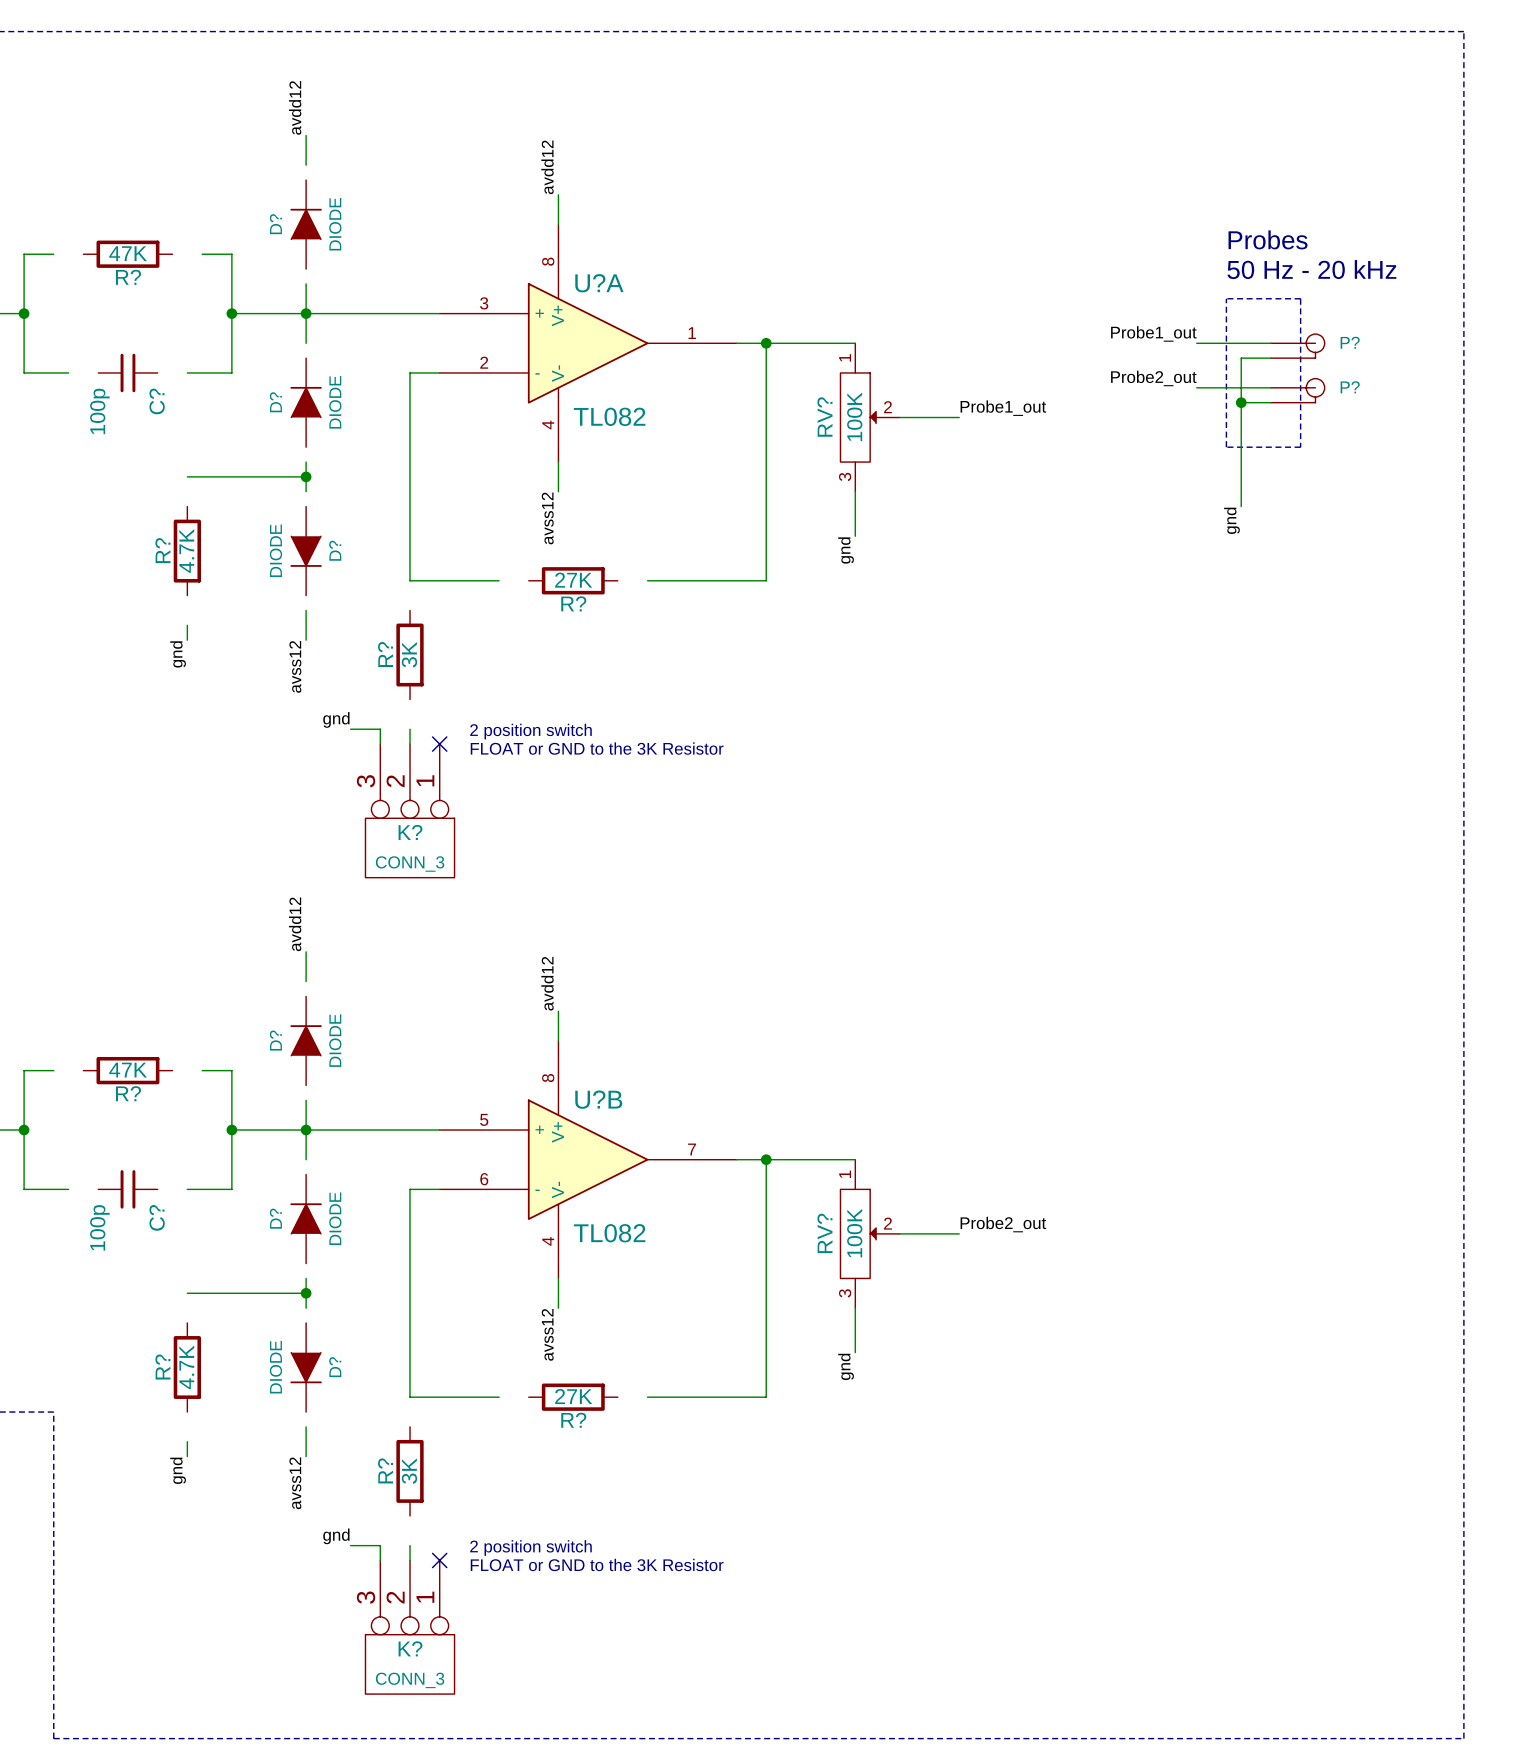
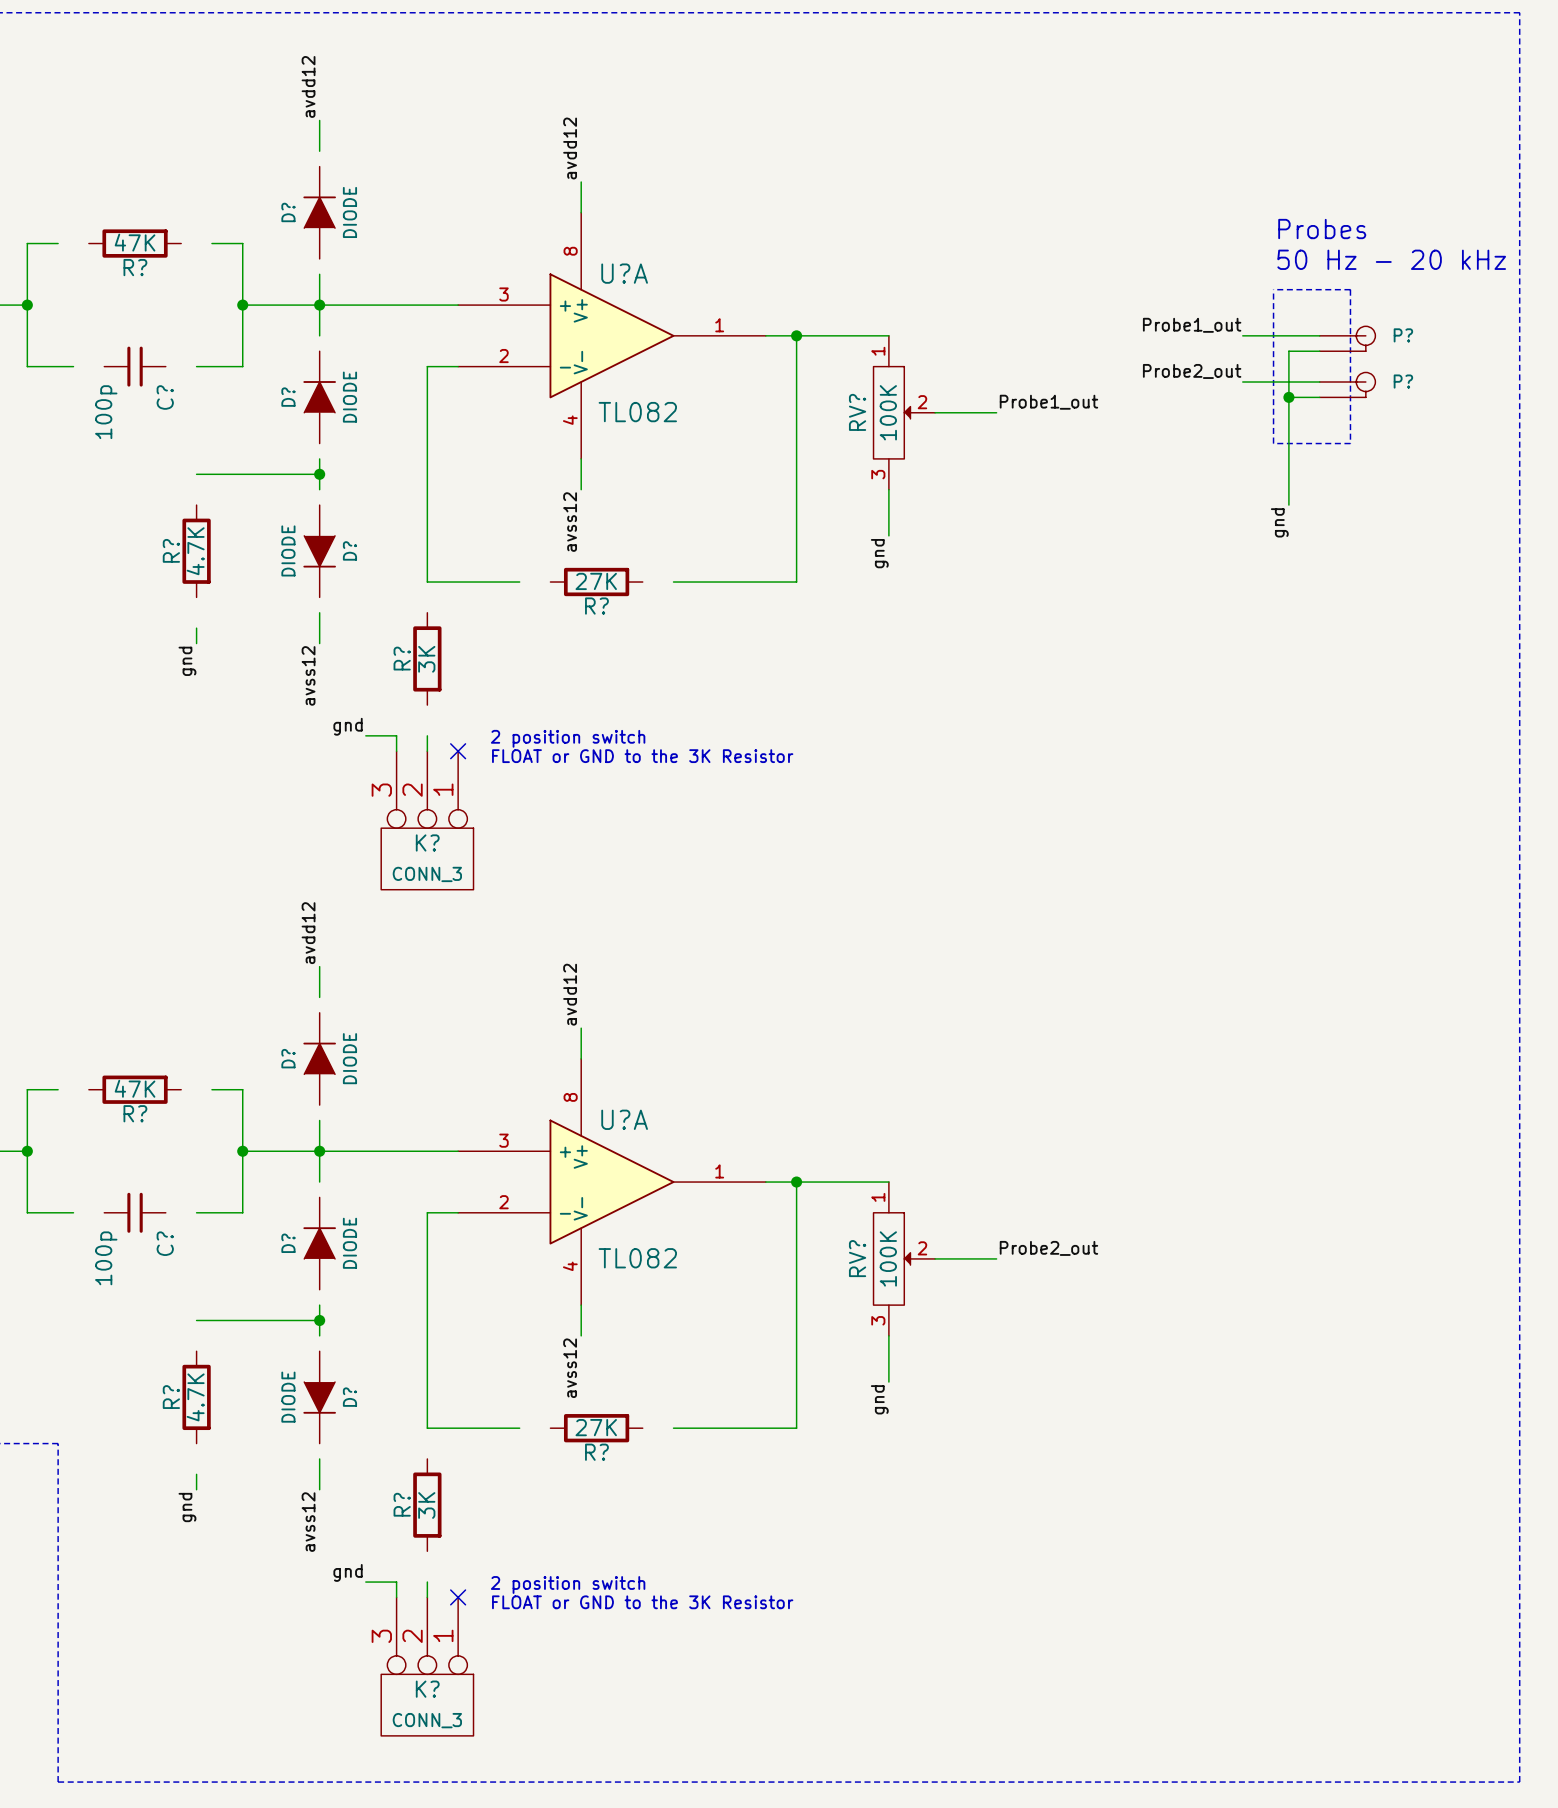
U?B name: U?B (598, 1099) -> U?A (624, 1119)
U?B pin number: 5 (484, 1119) -> 3 (503, 1140)
U?B pin number: 7 (692, 1149) -> 1 (719, 1171)
U?B pin number: 6 (484, 1179) -> 2 (503, 1202)

